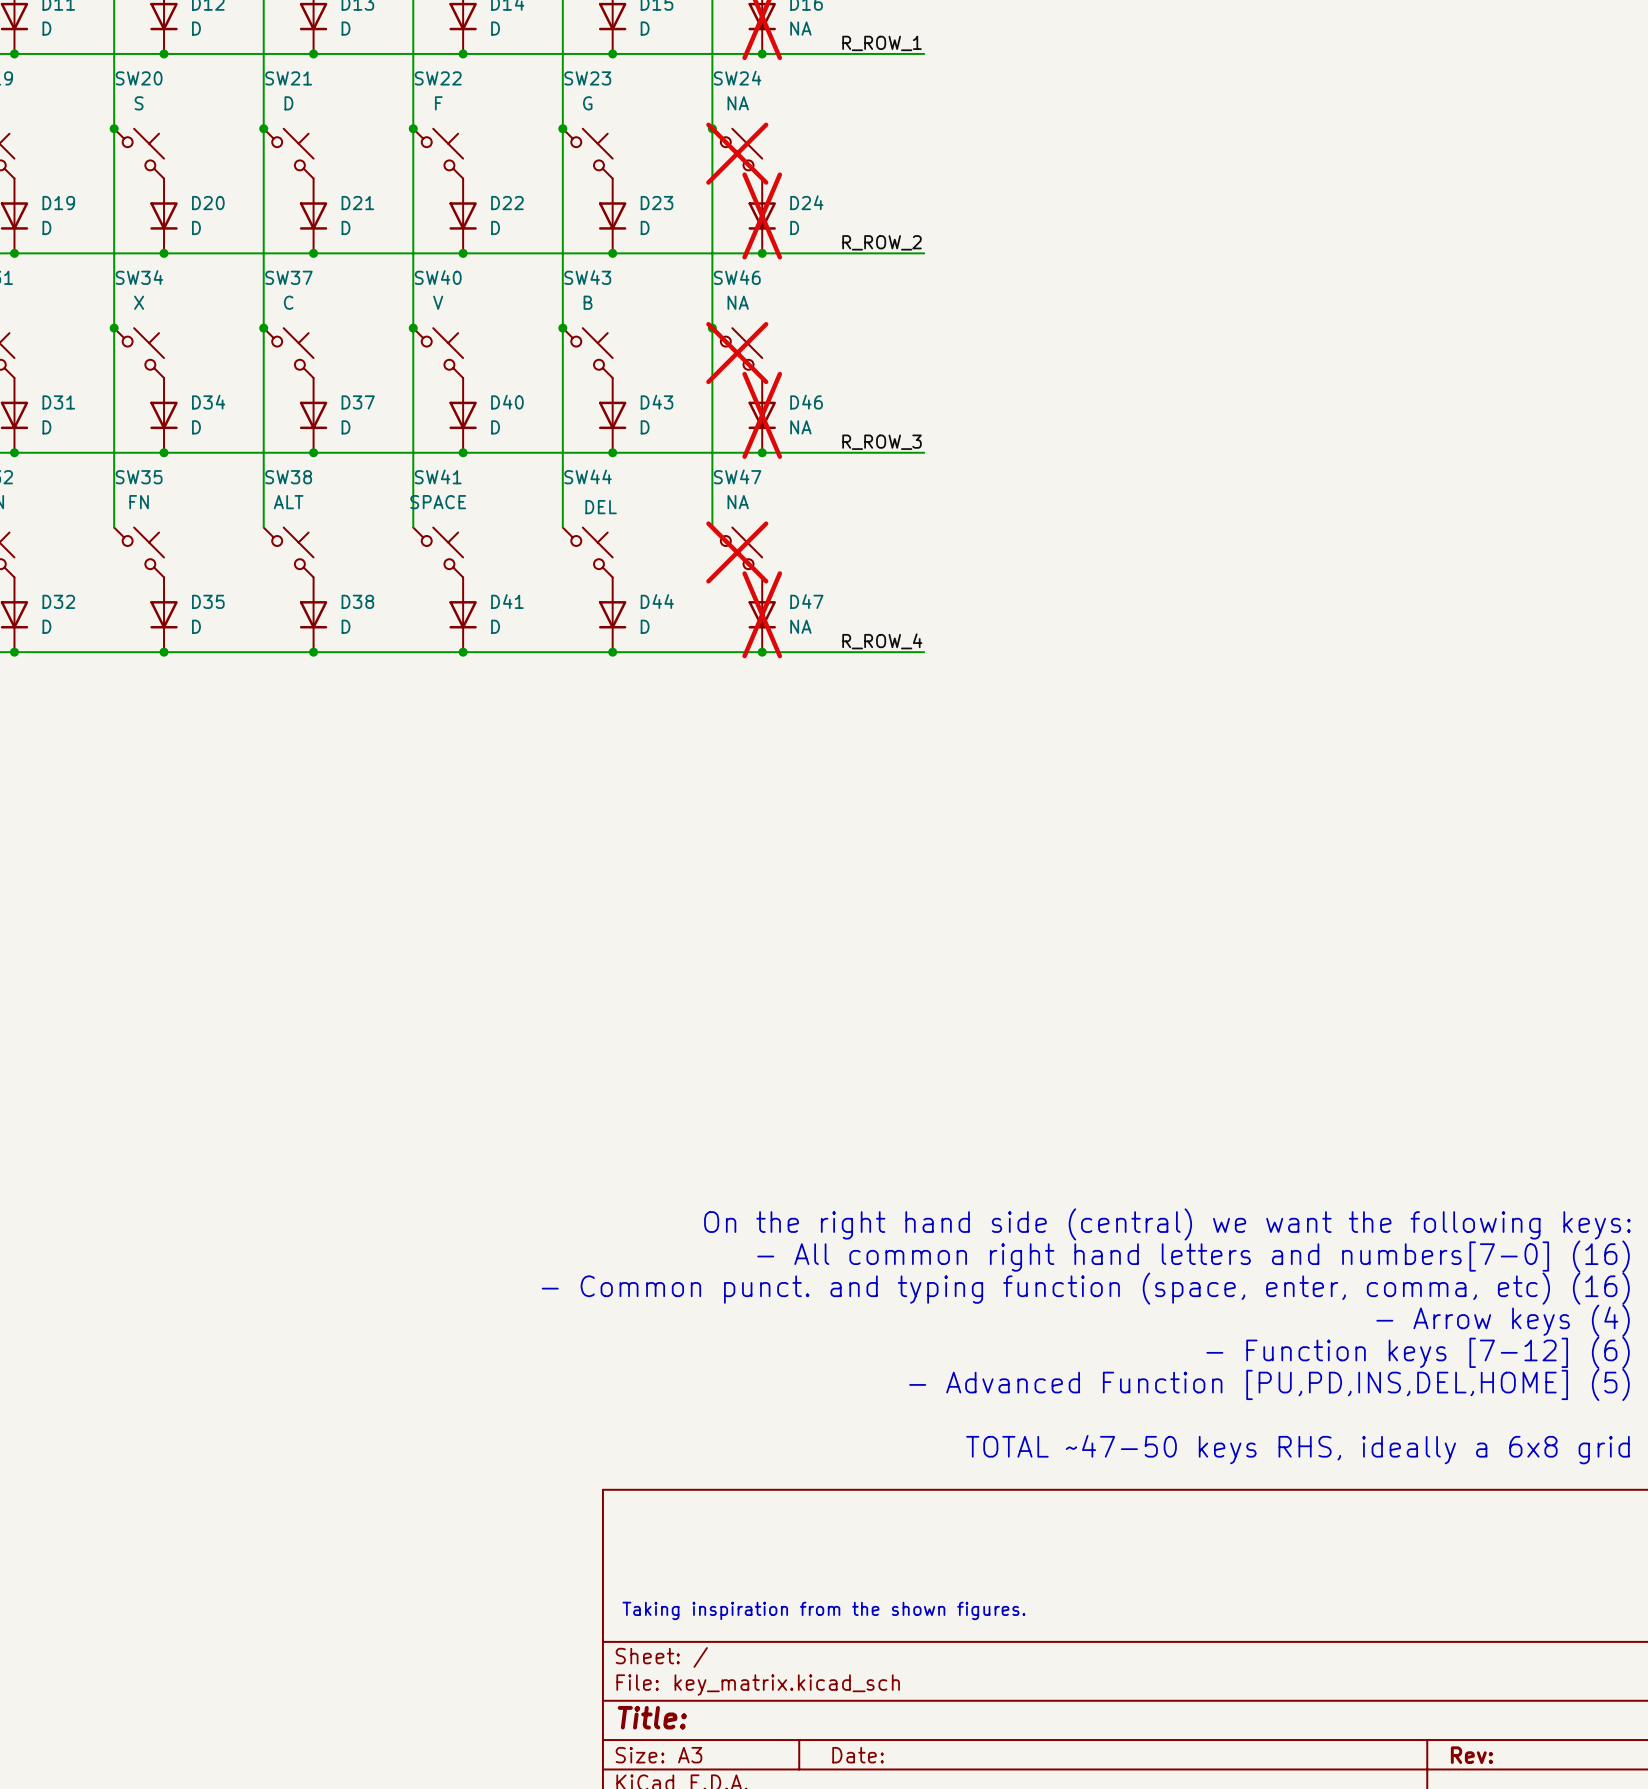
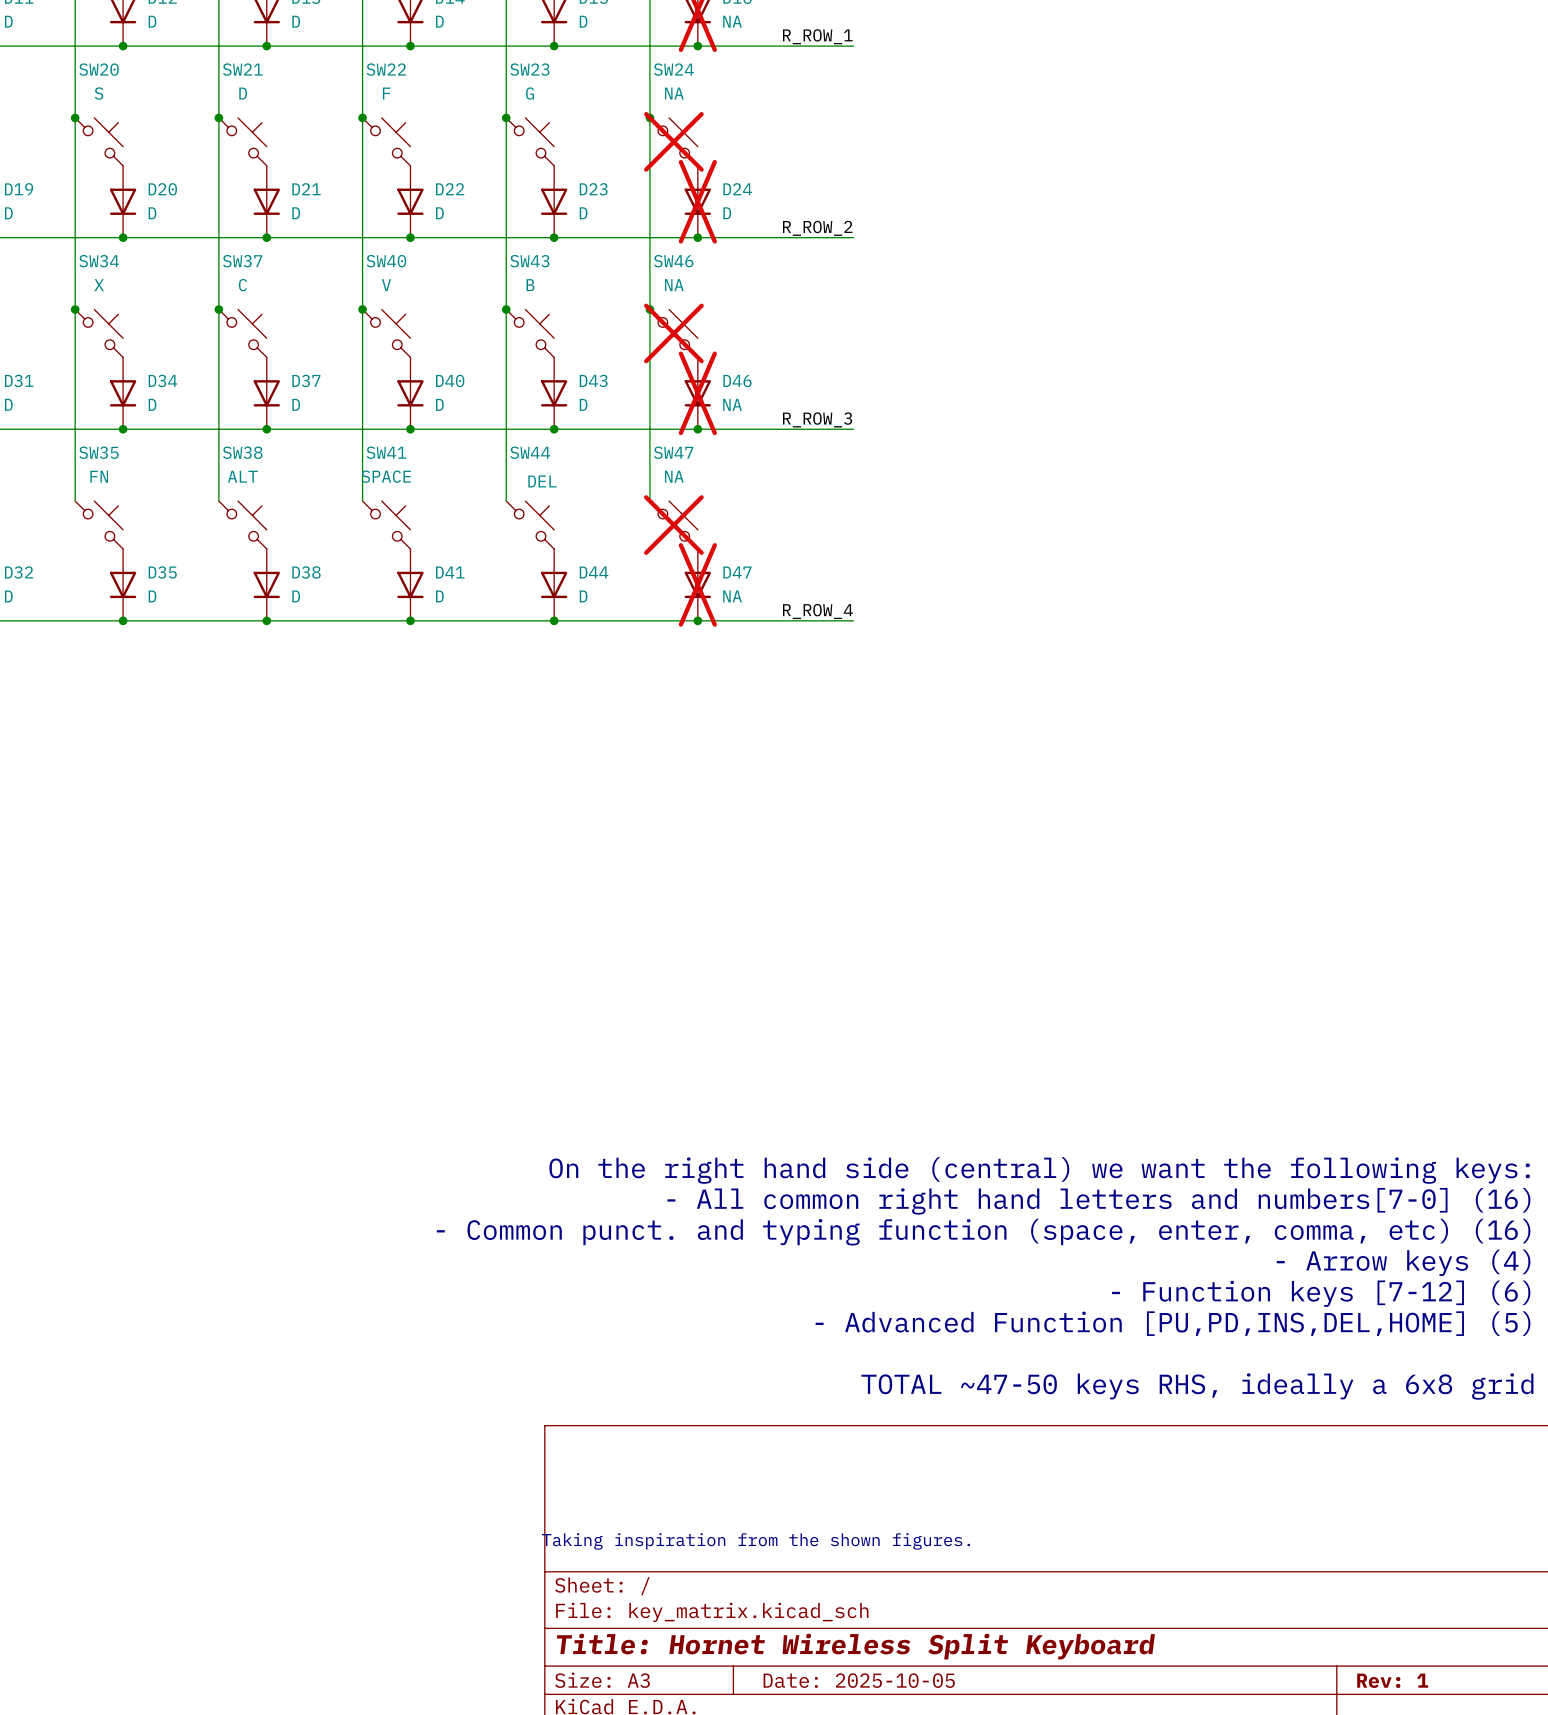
title block: Title: (652, 1717) -> Title: Hornet Wireless Split Keyboard (855, 1646)
title block: Date: (858, 1755) -> Date: 2025-10-05 (859, 1680)
title block: Rev: (1471, 1755) -> Rev: 1 (1392, 1680)

